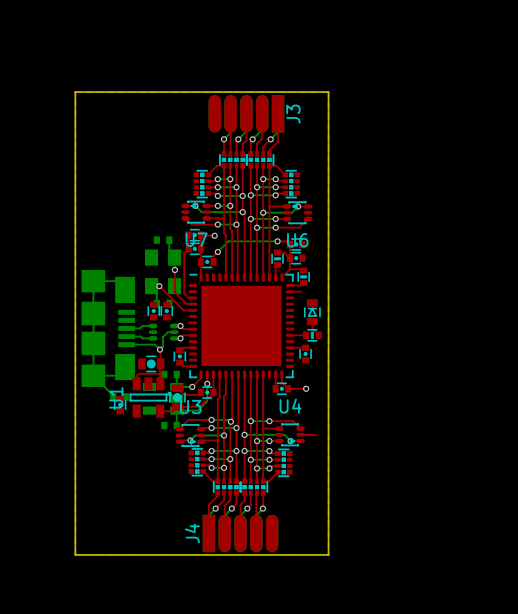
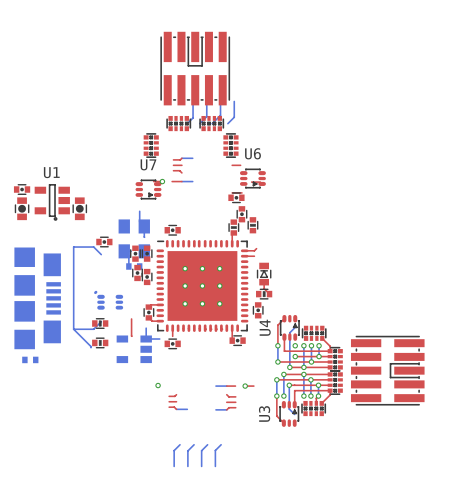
part: none -> (195, 68)
board edge: (75, 92) (75, 554) (328, 554) (328, 92) (75, 92) -> none
top track: (230, 113) (230, 153) -> none
top track: (246, 113) (246, 140) (242, 144) (242, 153) -> none
J3: (246, 113) -> none
top track: (262, 113) (262, 138) (257, 143) (257, 153) -> none
top track: (278, 113) (278, 141) (269, 150) (269, 153) -> none
part: none -> (178, 123)
top track: (224, 139) (224, 153) -> none
via: (224, 139) -> none
top track: (238, 139) (236, 141) (236, 153) -> none
via: (238, 139) -> none
top track: (252, 139) (250, 141) (250, 153) -> none
part: none -> (211, 123)
via: (252, 139) -> none
top track: (270, 139) (263, 146) (263, 153) -> none
via: (270, 139) -> none
part: (233, 159) -> none
part: (260, 159) -> none
part: none -> (151, 145)
part: none -> (230, 145)
top track: (230, 165) (232, 277) (230, 276) -> none
top track: (236, 165) (236, 227) -> none
top track: (242, 165) (242, 213) -> none
top track: (250, 165) (251, 276) -> none
top track: (263, 165) (263, 276) -> none
top track: (256, 166) (257, 276) -> none
top track: (208, 174) (217, 165) (224, 165) (225, 277) (224, 276) -> none
top track: (285, 174) (276, 165) (269, 165) (270, 276) -> none
via: (217, 179) -> none
via: (230, 179) -> none
bottom track: (263, 179) (275, 179) -> none
via: (263, 179) -> none
top track: (275, 179) (285, 181) -> none
via: (275, 179) -> none
part: (202, 184) -> none
part: (291, 184) -> none
bottom track: (217, 187) (236, 187) -> none
via: (217, 187) -> none
via: (236, 187) -> none
bottom track: (257, 187) (275, 187) -> none
via: (257, 187) -> none
via: (275, 187) -> none
top track: (285, 193) (275, 195) -> none
bottom track: (217, 195) (242, 195) -> none
via: (217, 195) -> none
via: (242, 195) -> none
bottom track: (250, 195) (275, 195) -> none
via: (250, 195) -> none
via: (275, 195) -> none
bottom track: (195, 205) (201, 212) (242, 212) -> none
via: (217, 205) -> none
via: (230, 205) -> none
top track: (269, 206) (286, 206) -> none
bottom track: (298, 206) (291, 212) (263, 212) -> none
via: (298, 206) -> none
U7 rotation: 0° (196, 212) -> 180° (148, 189)
top track: (242, 212) (244, 213) (244, 277) (243, 276) -> none
via: (242, 212) -> none
via: (263, 212) -> none
U6 rotation: 0° (297, 212) -> 180° (252, 178)
part: none -> (22, 189)
top track: (185, 218) (191, 224) (217, 224) -> none
top track: (206, 218) (224, 218) -> none
bottom track: (250, 218) (275, 218) -> none
via: (250, 218) -> none
via: (275, 218) -> none
top track: (308, 218) (299, 227) (275, 227) -> none
bottom track: (217, 224) (236, 224) -> none
via: (217, 224) -> none
top track: (236, 224) (237, 276) -> none
via: (236, 224) -> none
part: none -> (236, 197)
bottom track: (257, 227) (275, 227) -> none
via: (257, 227) -> none
via: (275, 227) -> none
top track: (188, 235) (188, 248) (184, 253) (184, 293) (188, 297) (192, 297) -> none
part: (194, 235) -> none
top track: (214, 235) (201, 235) (201, 277) -> none
via: (214, 235) -> none
part: none -> (22, 208)
part: none -> (79, 208)
part side: bottom (163, 240) -> top (104, 242)
top track: (277, 241) (286, 241) (289, 244) (289, 269) -> none
bottom track: (277, 241) (228, 241) (217, 251) -> none
via: (277, 241) -> none
part rotation: 0° (296, 244) -> 90° clockwise (241, 214)
part: (194, 248) -> none
top track: (217, 251) (213, 256) (213, 261) -> none
via: (217, 251) -> none
part footprint: [286, 251, 306, 265] -> [247, 217, 259, 234]
top track: (277, 252) (284, 252) (289, 258) -> none
top track: (174, 269) (174, 292) (186, 304) (192, 304) -> none
via: (174, 269) -> none
top track: (289, 269) (303, 270) -> none
top track: (289, 269) (281, 277) -> none
part footprint: [188, 273, 295, 379] -> [156, 239, 249, 332]
part: (303, 276) -> none
top track: (159, 286) (183, 310) (192, 310) -> none
via: (159, 286) -> none
part: none -> (135, 253)
part: none -> (147, 253)
part: (153, 311) -> none
part: none -> (147, 276)
bottom track: (153, 325) (126, 328) -> none
top track: (180, 325) (183, 329) (192, 329) -> none
via: (180, 325) -> none
part position: (108, 328) -> (37, 298)
part position: (163, 332) -> (110, 302)
bottom track: (174, 332) (168, 332) (163, 337) (163, 346) (159, 349) (154, 344) (126, 344) -> none
bottom track: none -> (96, 292) (95, 292)
top track: (192, 335) (183, 335) (180, 338) -> none
top track: (289, 335) (306, 335) -> none
bottom track: (126, 336) (153, 338) -> none
via: (180, 338) -> none
top track: (289, 347) (305, 347) -> none
top track: (159, 349) (160, 363) -> none
via: (159, 349) -> none
part: (151, 363) -> none
top track: none -> (284, 318) (277, 325) (277, 345)
top track: (159, 373) (138, 373) (136, 376) (136, 383) -> none
bottom track: none -> (295, 327) (289, 332) (289, 367)
part side: bottom (170, 374) -> top (100, 323)
top track: (201, 374) (201, 378) (192, 386) -> none
top track: (213, 374) (213, 392) (199, 406) (177, 406) (173, 411) (160, 411) -> none
top track: (219, 374) (217, 481) (212, 481) (203, 471) -> none
top track: (225, 374) (224, 481) -> none
top track: (232, 374) (230, 421) -> none
top track: (238, 374) (236, 481) -> none
top track: (244, 374) (244, 481) -> none
top track: (250, 374) (250, 481) -> none
top track: (257, 374) (257, 481) -> none
top track: (263, 374) (263, 481) (268, 481) (277, 472) -> none
top track: (281, 374) (281, 382) (288, 388) (306, 388) -> none
part: none -> (314, 333)
bottom track: (207, 383) (207, 401) (197, 410) (176, 410) (176, 425) -> none
via: (207, 383) -> none
top track: none -> (284, 337) (284, 351) (330, 351) (330, 346) (322, 338)
via: (192, 386) -> none
top track: (177, 388) (184, 395) (198, 395) (201, 392) -> none
via: (306, 388) -> none
bottom track: none -> (277, 345) (277, 362)
via: none -> (277, 345)
via: none -> (295, 345)
bottom track: none -> (303, 345) (303, 367)
via: none -> (303, 345)
bottom track: none -> (311, 345) (311, 362)
via: none -> (311, 345)
bottom track: none -> (319, 345) (319, 356)
via: none -> (319, 345)
part position: (119, 396) -> (30, 359)
U1 rotation: 0° (150, 397) -> 90° clockwise (52, 202)
U1 position: (150, 397) -> (52, 202)
part: (177, 397) -> none
part: (120, 404) -> none
top track: none -> (295, 356) (330, 356)
via: none -> (295, 356)
via: none -> (319, 356)
part: none -> (335, 359)
top track: none -> (277, 362) (330, 362)
via: none -> (277, 362)
via: none -> (311, 362)
top track: (211, 419) (188, 419) (180, 428) -> none
bottom track: (211, 419) (230, 419) -> none
via: (211, 419) -> none
top track: (230, 419) (230, 481) -> none
top track: none -> (289, 367) (330, 367)
via: none -> (289, 367)
via: none -> (303, 367)
via: (230, 421) -> none
bottom track: (250, 421) (269, 421) -> none
via: (250, 421) -> none
top track: (269, 421) (293, 421) (300, 428) -> none
via: (269, 421) -> none
part: none -> (387, 370)
part side: bottom (170, 425) -> top (100, 342)
top track: none -> (283, 374) (330, 374)
bottom track: none -> (283, 374) (283, 396)
via: none -> (283, 374)
bottom track: none -> (303, 374) (303, 396)
via: none -> (303, 374)
top track: (201, 428) (211, 428) -> none
bottom track: (211, 428) (236, 428) -> none
via: (211, 428) -> none
via: (236, 428) -> none
top track: (263, 428) (279, 428) -> none
top track: none -> (276, 379) (330, 379)
bottom track: none -> (276, 379) (276, 396)
via: none -> (276, 379)
bottom track: none -> (310, 379) (310, 396)
via: none -> (310, 379)
bottom track: (244, 434) (284, 434) (290, 441) -> none
via: (244, 434) -> none
U4 rotation: 0° (289, 434) -> 90° counterclockwise (289, 327)
U4 position: (289, 434) -> (289, 327)
top track: (300, 434) (316, 434) -> none
U3 rotation: 0° (190, 435) -> 90° counterclockwise (289, 413)
U3 position: (190, 435) -> (289, 413)
bottom track: (224, 435) (195, 435) (190, 440) -> none
via: (224, 435) -> none
part: none -> (335, 382)
top track: (180, 440) (190, 440) -> none
top track: (201, 440) (217, 440) -> none
top track: none -> (289, 385) (330, 385)
bottom track: none -> (289, 385) (289, 409) (294, 414)
via: none -> (289, 385)
bottom track: none -> (318, 385) (318, 396)
via: none -> (318, 385)
via: (257, 441) -> none
via: (269, 441) -> none
bottom track: (211, 451) (236, 451) -> none
via: (211, 451) -> none
via: (236, 451) -> none
bottom track: (244, 451) (269, 451) -> none
via: (244, 451) -> none
via: (269, 451) -> none
top track: none -> (276, 396) (276, 416) (283, 423)
via: none -> (276, 396)
via: none -> (283, 396)
via: none -> (303, 396)
via: none -> (310, 396)
top track: none -> (318, 396) (316, 403)
via: none -> (318, 396)
bottom track: (211, 459) (230, 459) -> none
via: (211, 459) -> none
via: (230, 459) -> none
bottom track: (250, 459) (269, 459) -> none
via: (250, 459) -> none
via: (269, 459) -> none
top track: none -> (321, 403) (330, 395) (330, 390) (294, 390) (294, 404)
part: (197, 462) -> none
part: (283, 462) -> none
part: none -> (313, 408)
via: (211, 467) -> none
via: (224, 467) -> none
via: (257, 468) -> none
via: (269, 468) -> none
part: (227, 487) -> none
part: (253, 487) -> none
top track: (217, 493) (217, 495) (208, 504) (208, 533) -> none
top track: (224, 493) (224, 500) (215, 508) -> none
top track: (230, 493) (230, 500) (224, 505) (224, 533) -> none
top track: (236, 493) (236, 503) (231, 508) -> none
top track: (244, 493) (244, 500) (240, 504) (240, 533) (244, 529) -> none
top track: (250, 493) (250, 505) (247, 508) -> none
top track: (257, 493) (257, 532) -> none
top track: (263, 493) (262, 508) -> none
via: (215, 508) -> none
via: (231, 508) -> none
via: (247, 508) -> none
via: (262, 508) -> none
J4: (240, 533) -> none

